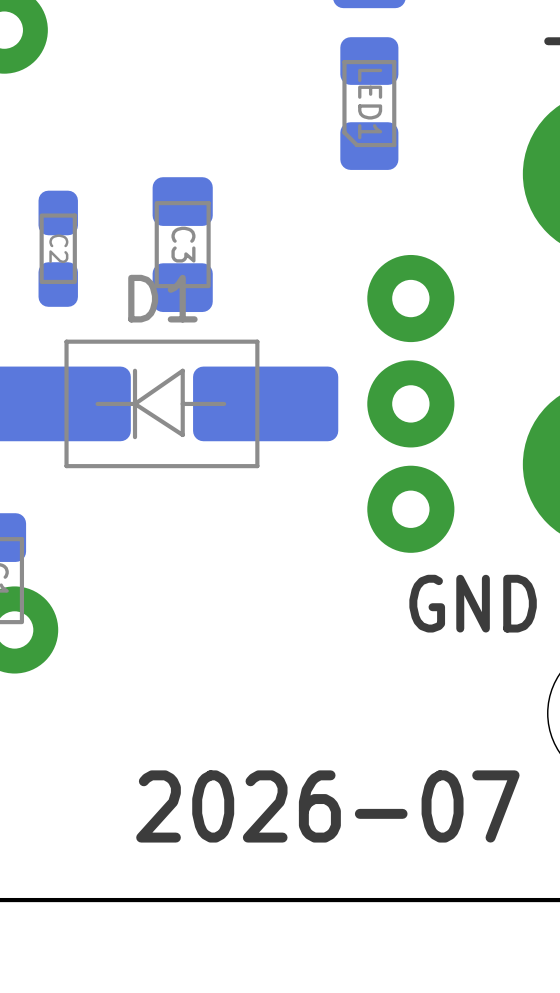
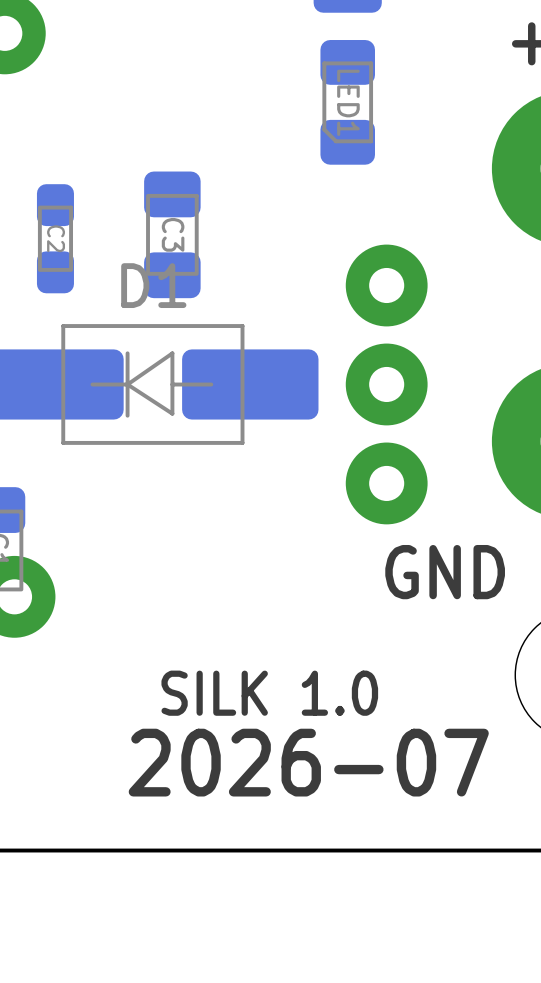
text: none -> SILK 1.0 (269, 693)

